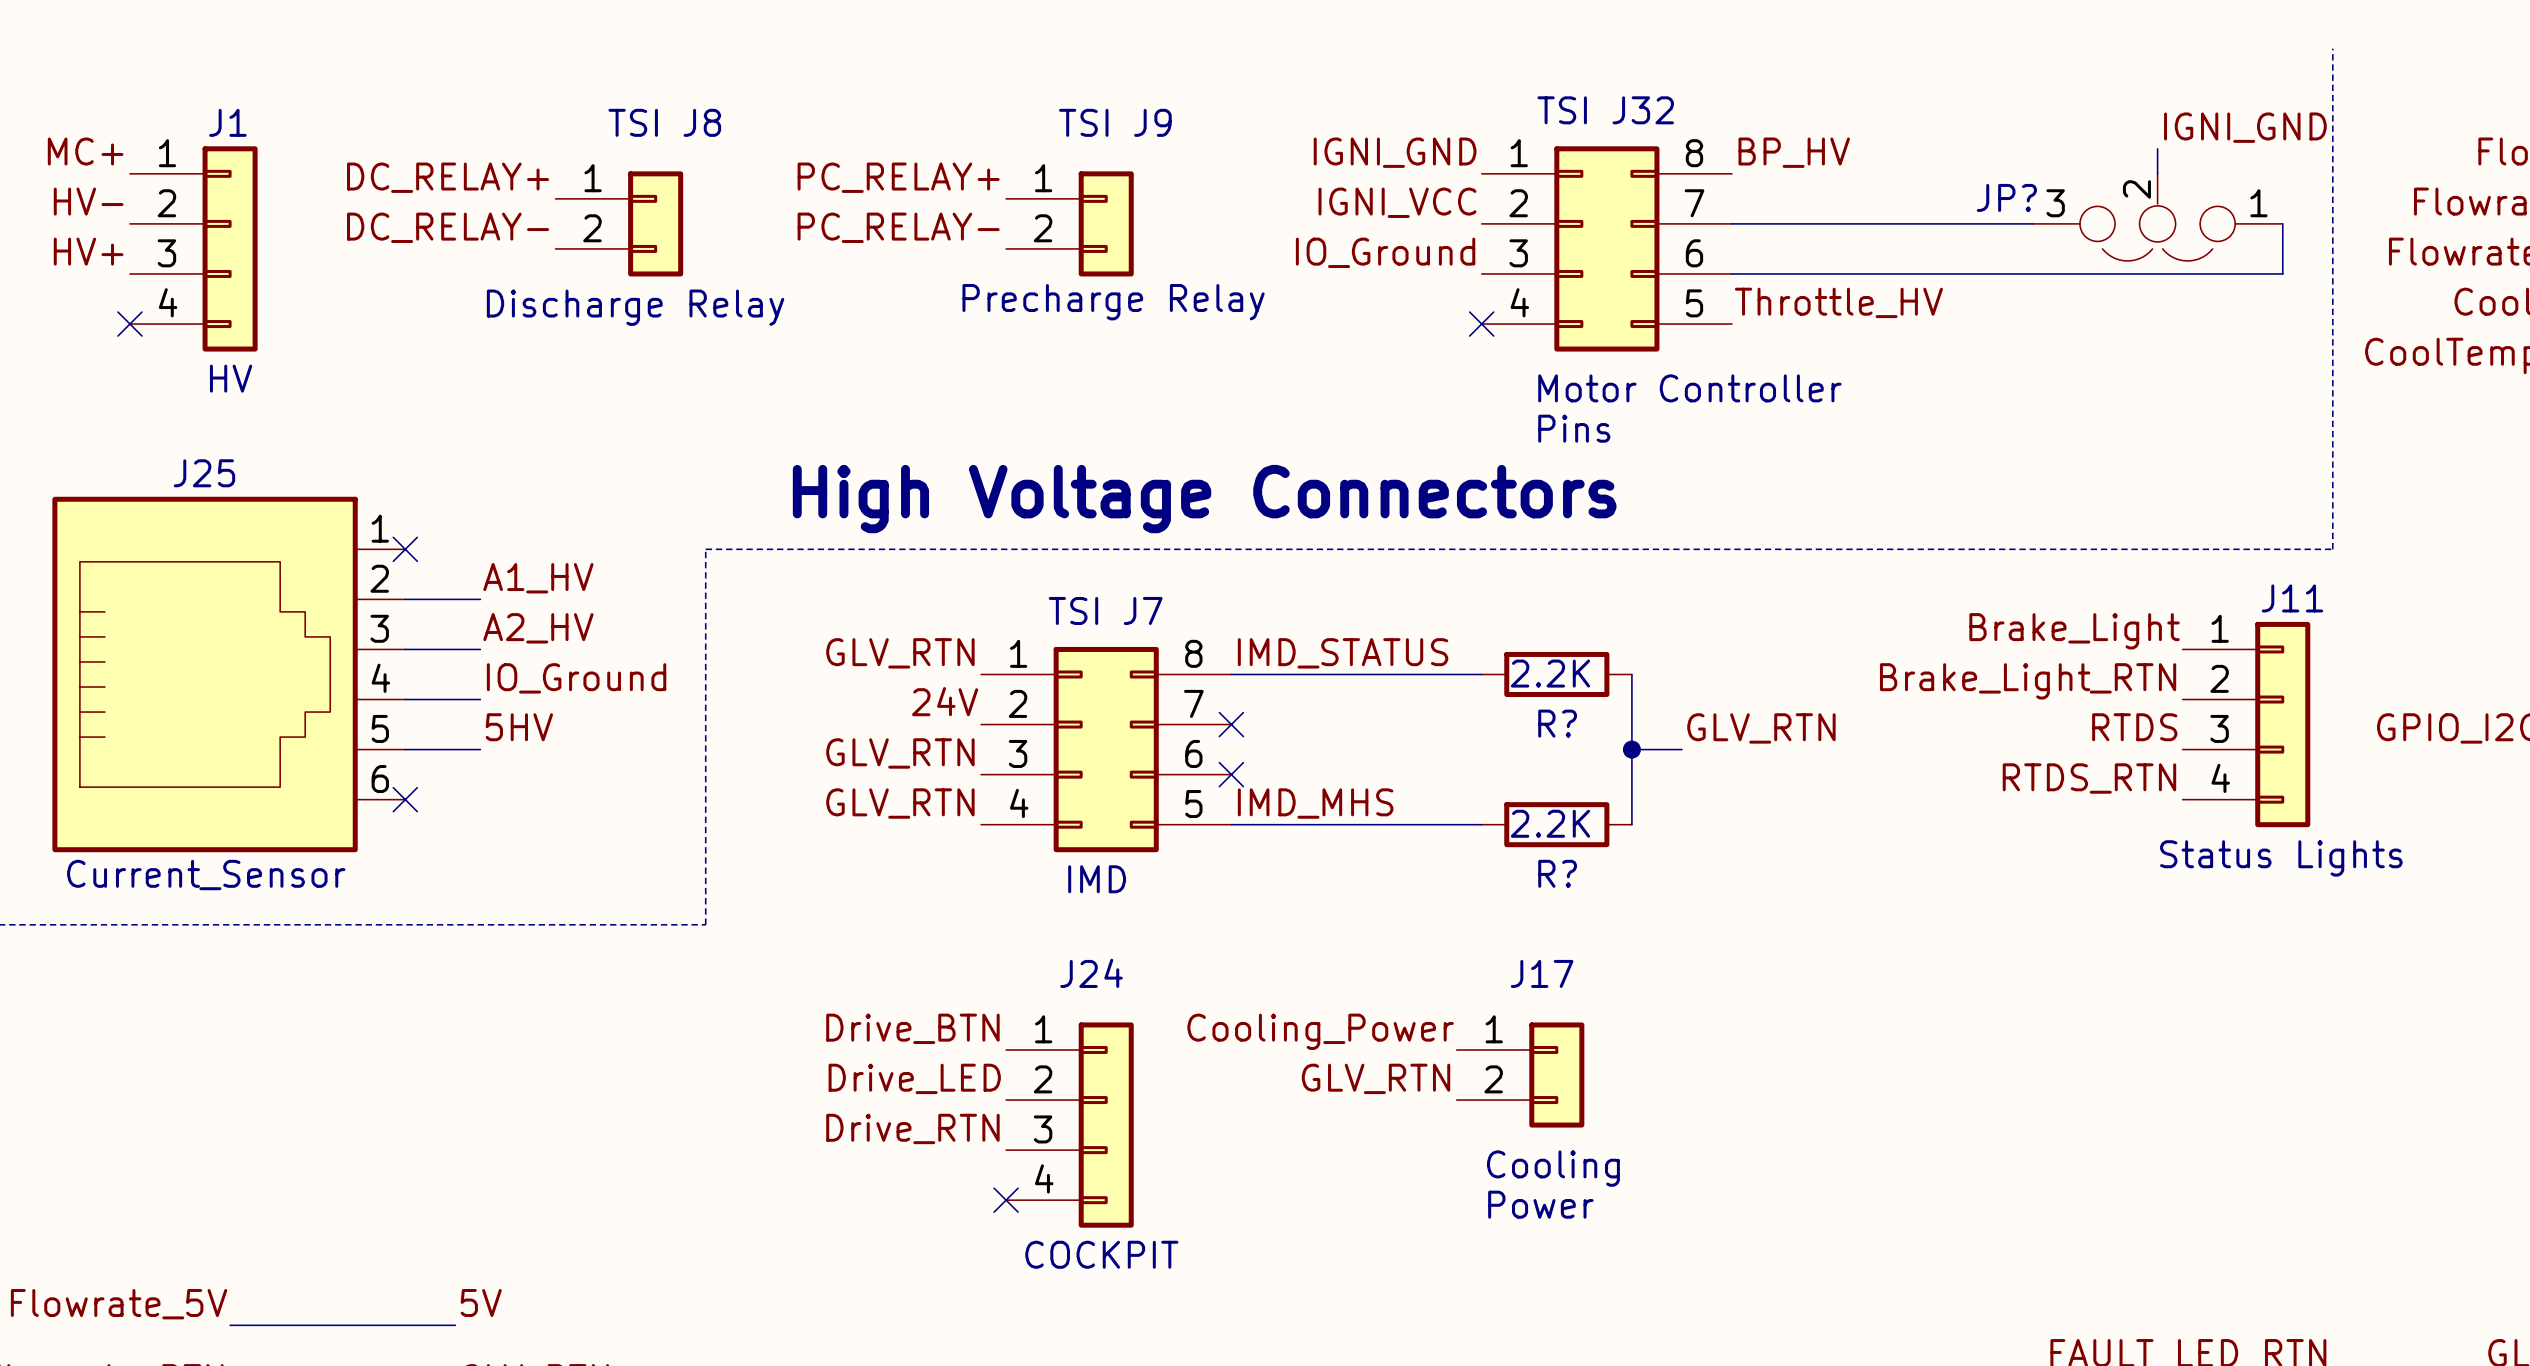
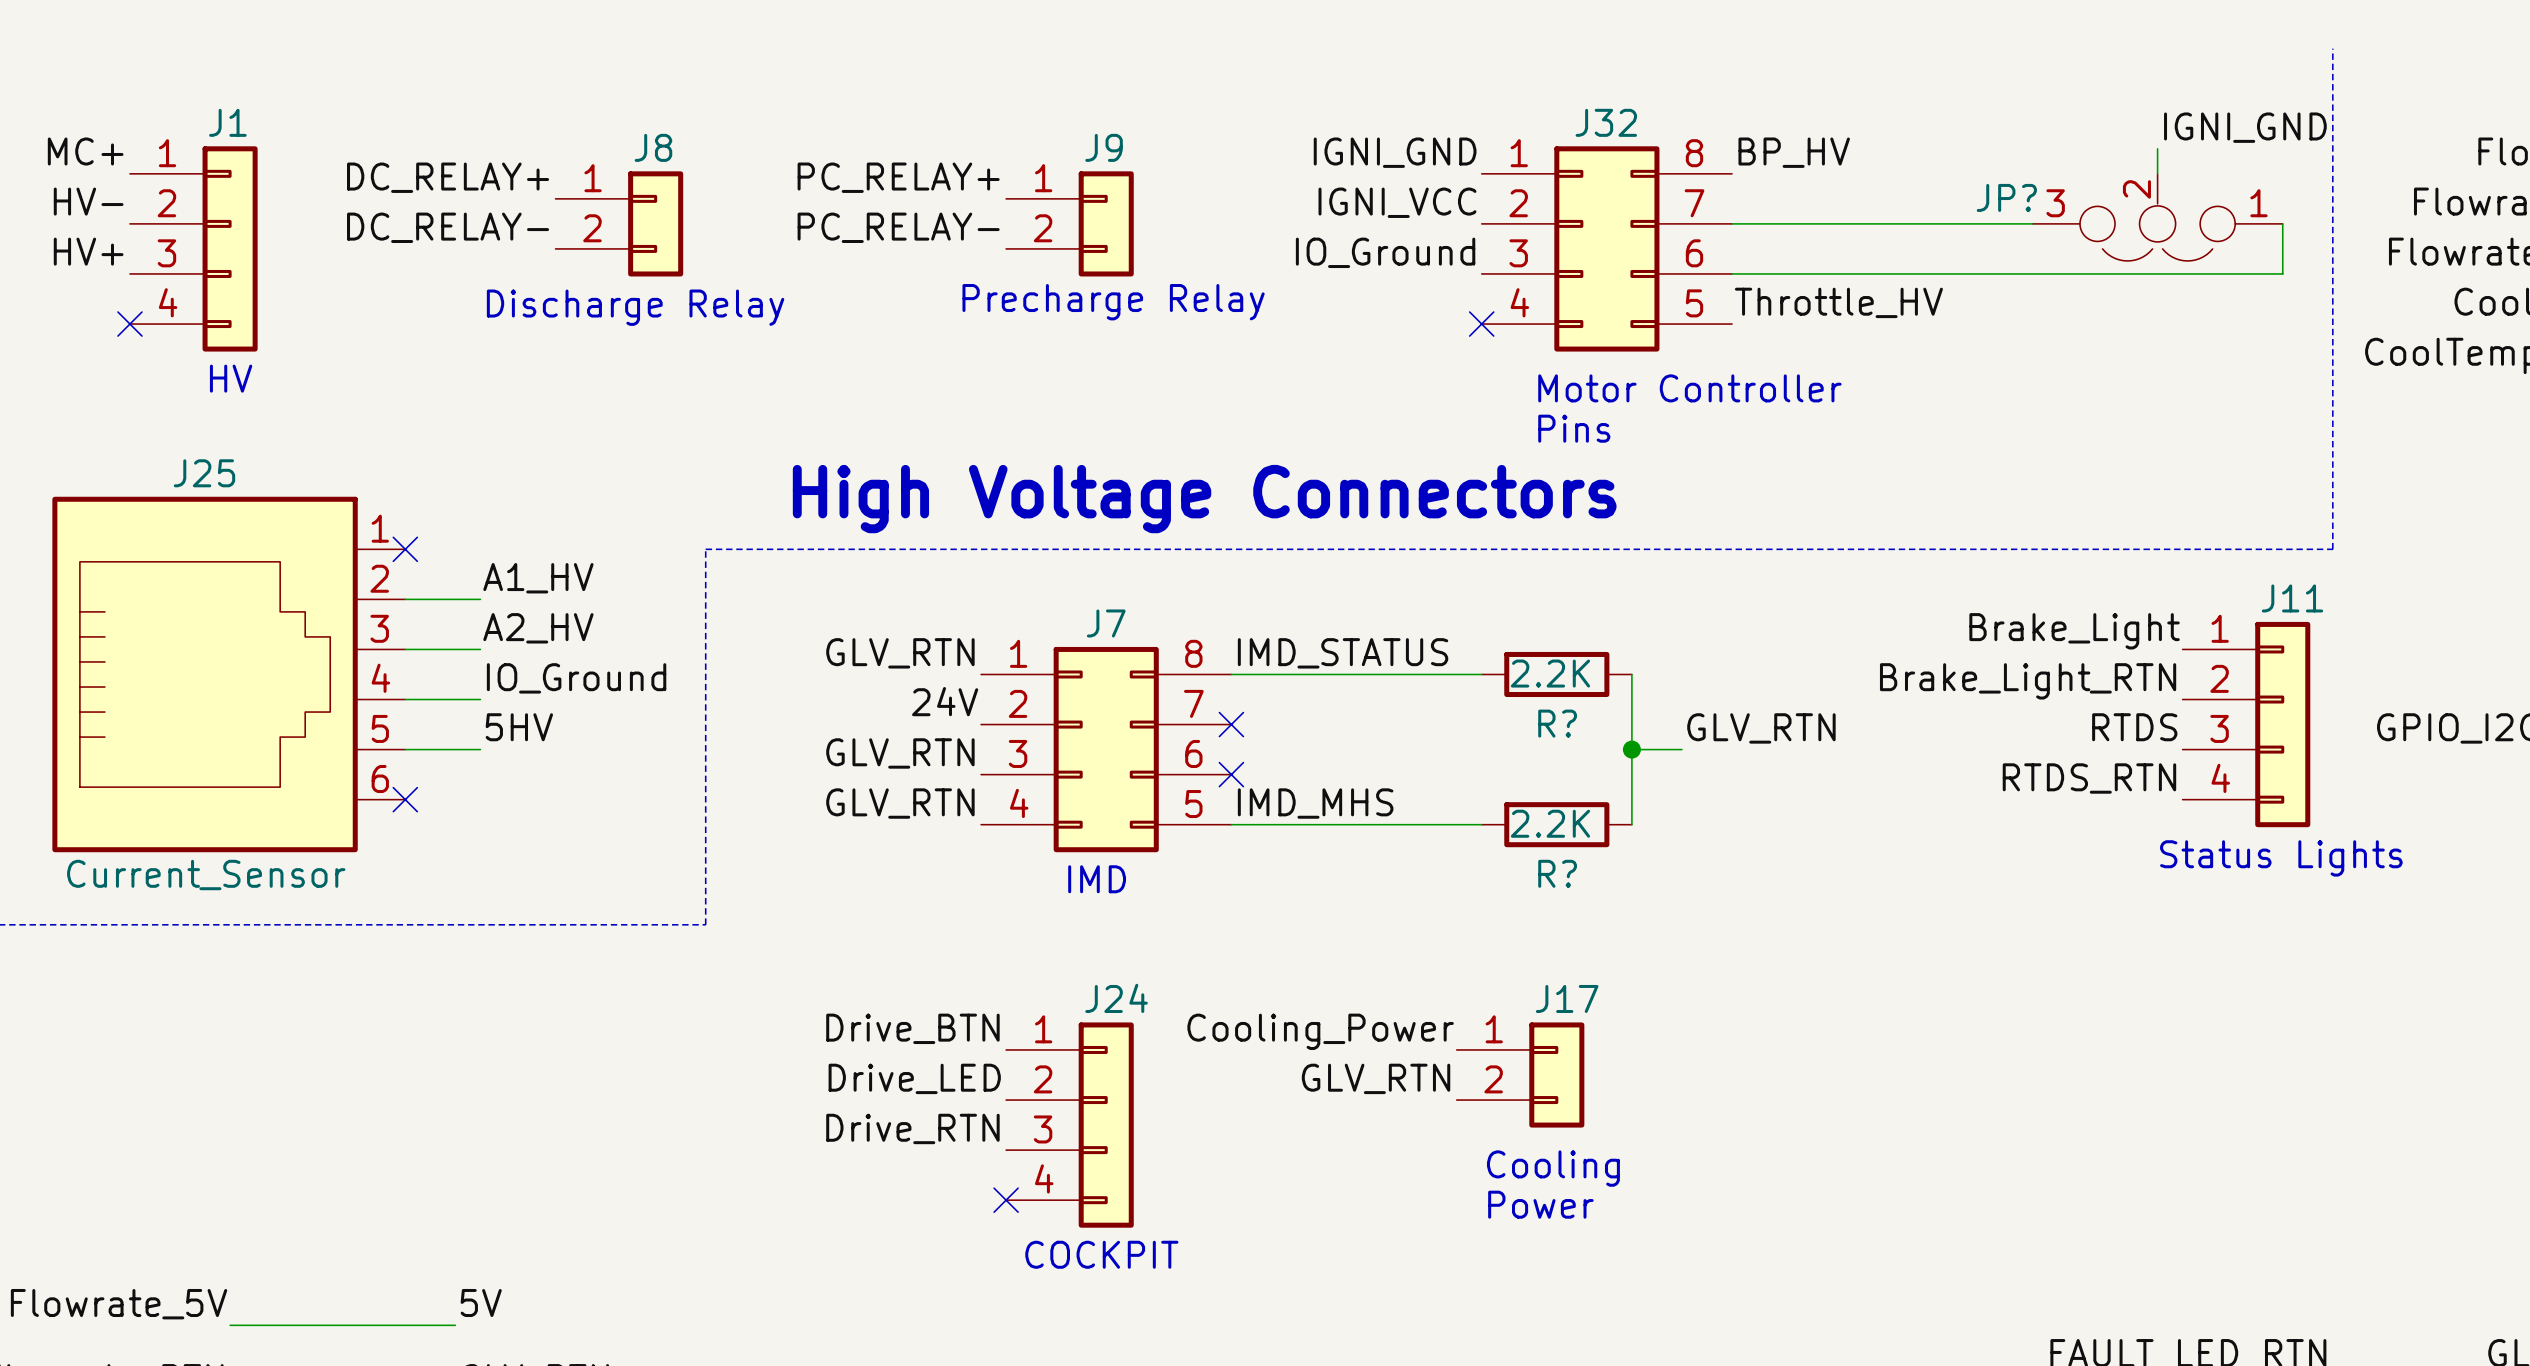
part value: TSI J32 (1605, 110) -> J32 (1606, 122)
part value: TSI J8 (664, 122) -> J8 (653, 147)
part value: TSI J9 (1115, 122) -> J9 (1104, 147)
part value: TSI J7 (1105, 610) -> J7 (1106, 623)
part value position: J24 (1091, 973) -> J24 (1116, 998)
part value position: J17 (1542, 973) -> J17 (1567, 998)

